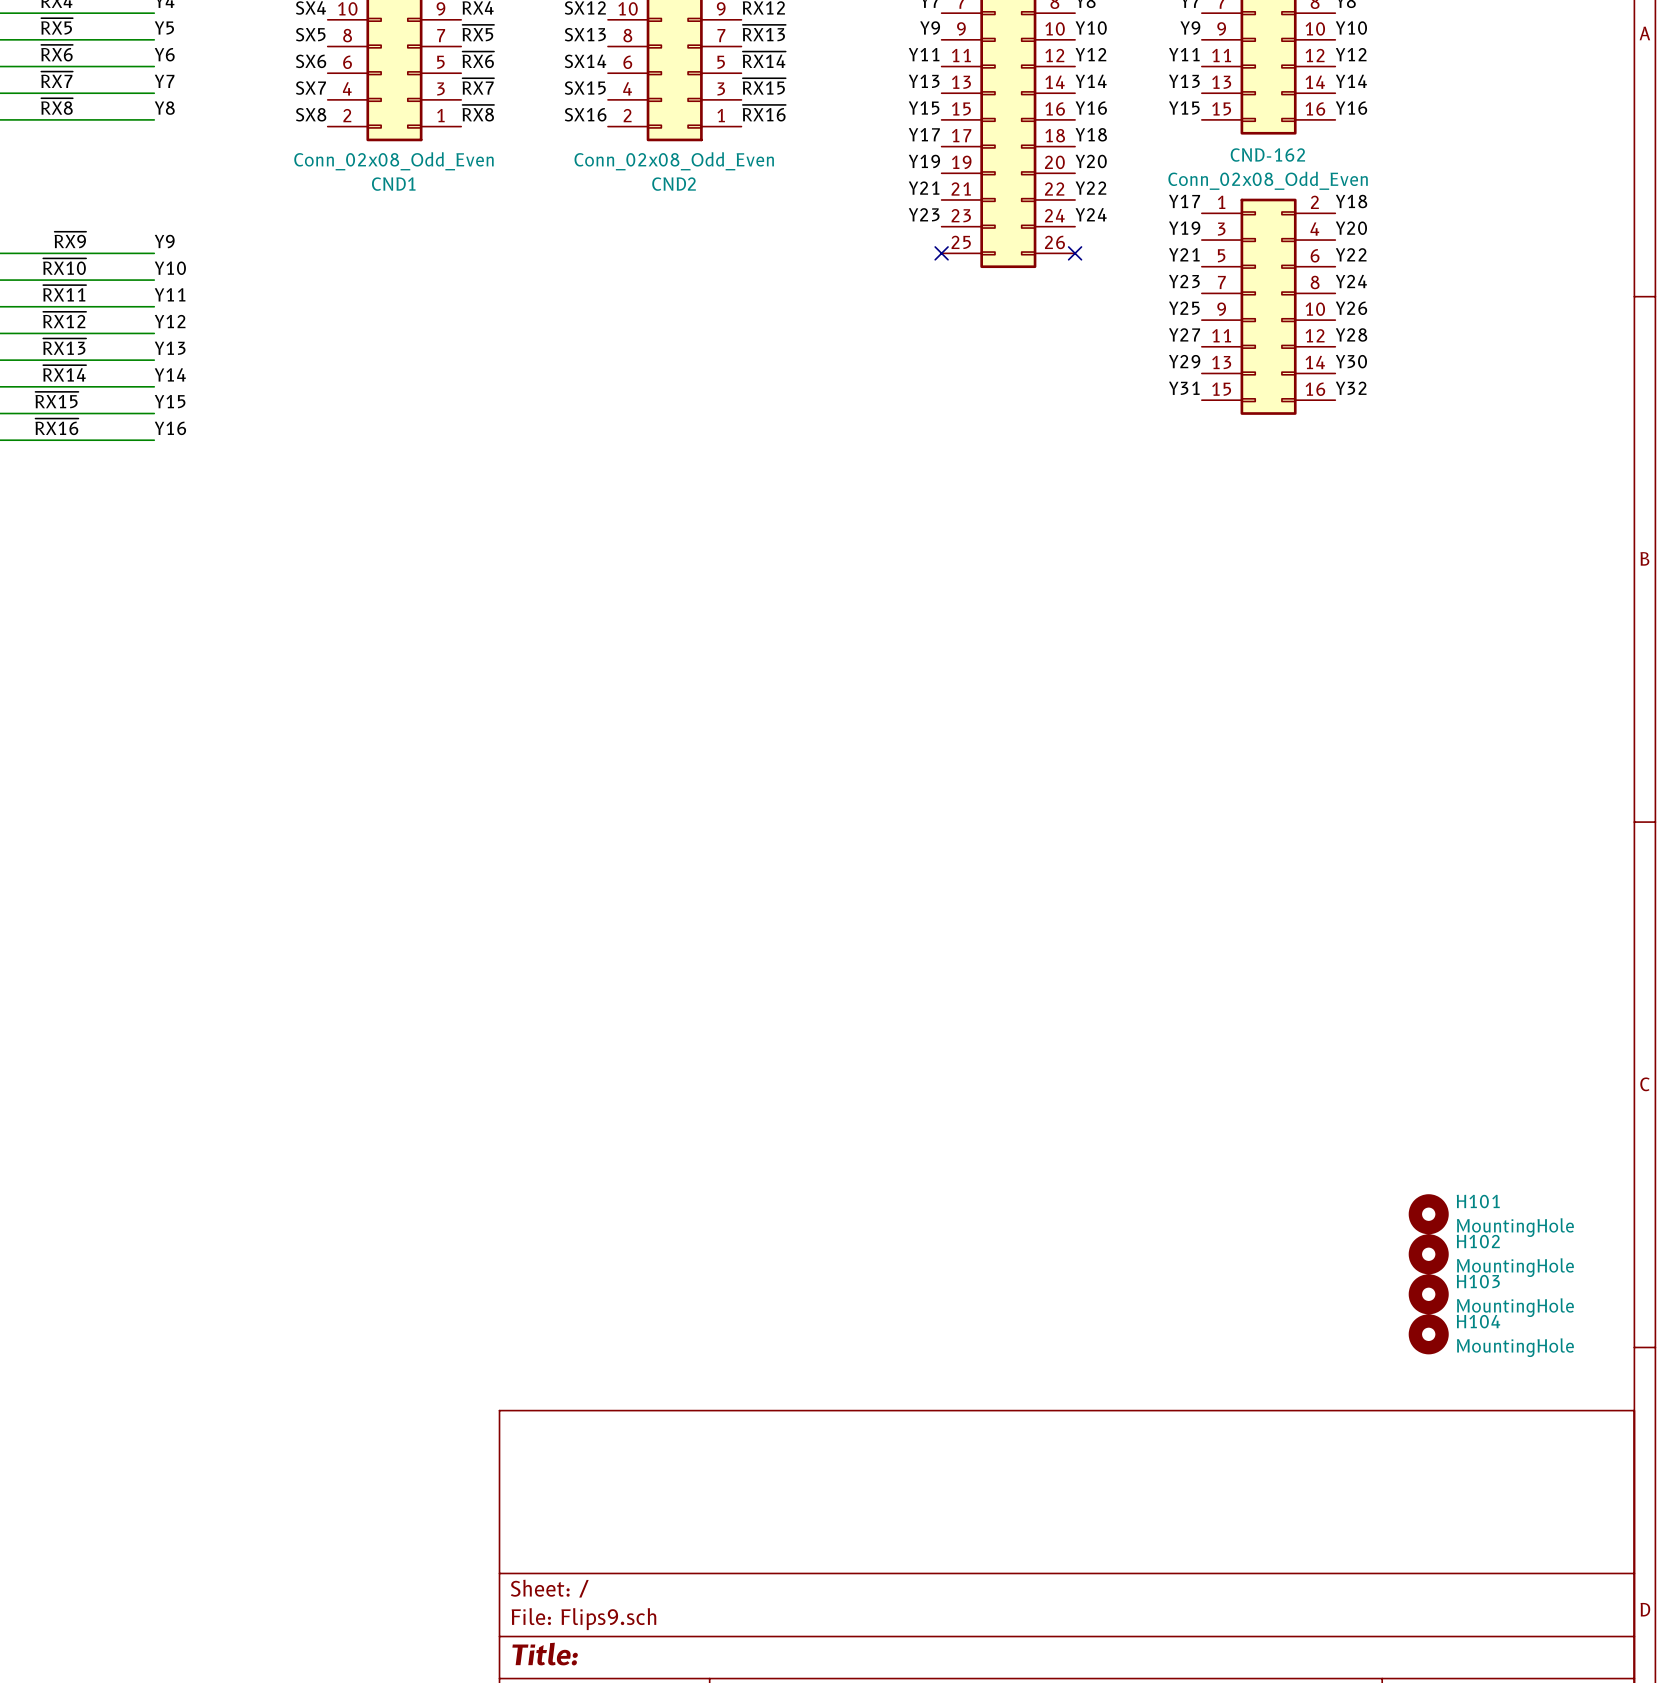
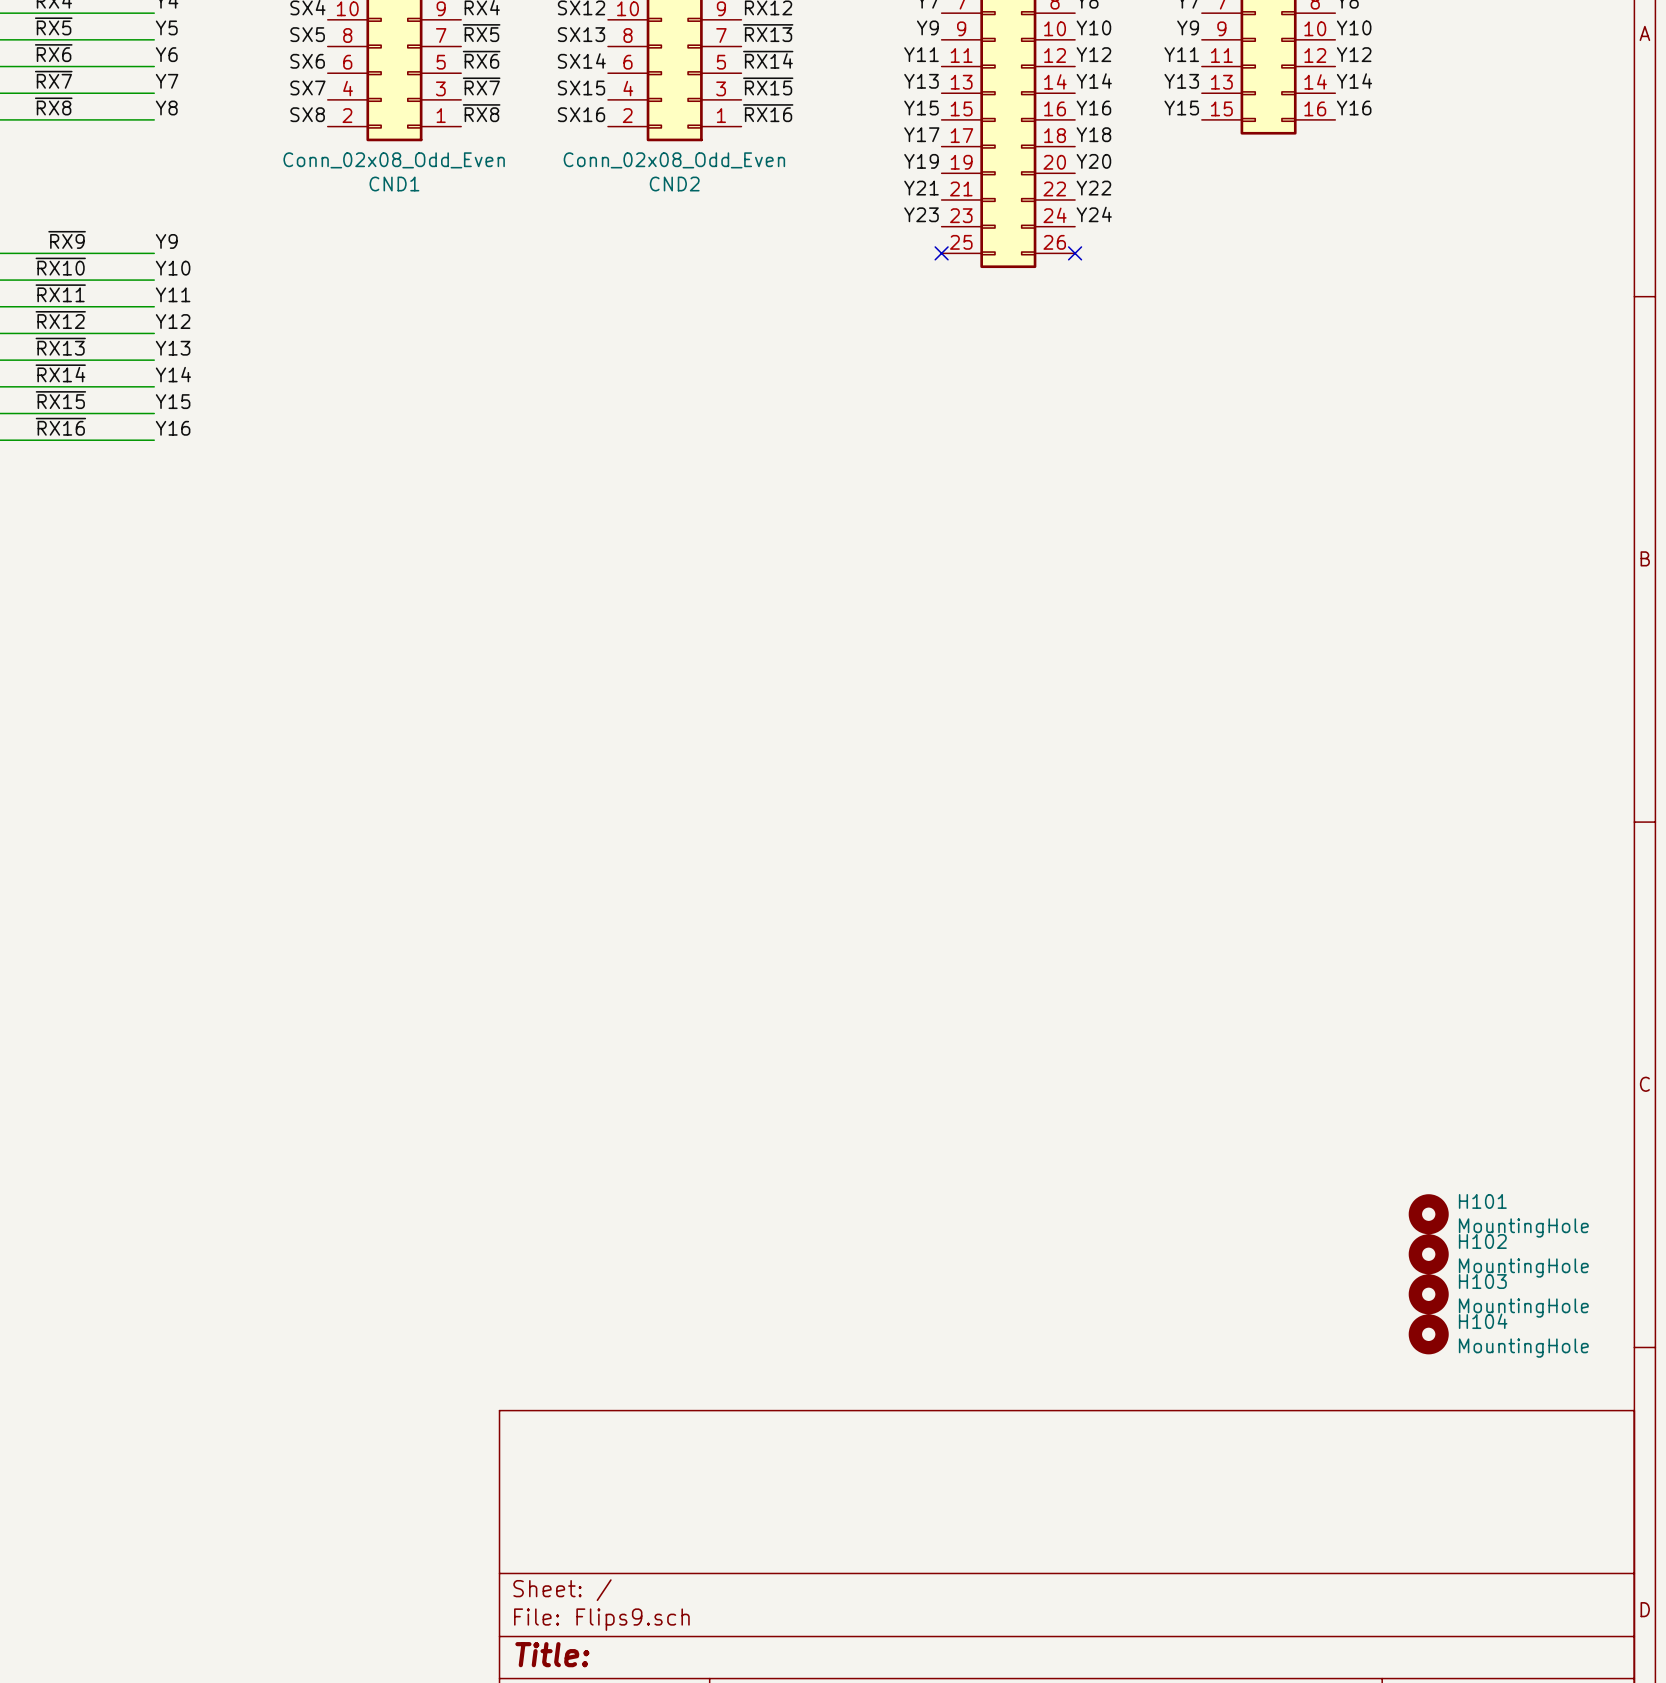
label: Y17 (1184, 201) -> none
label: Y18 (1351, 201) -> none
label: Y19 (1184, 228) -> none
label: Y20 (1351, 228) -> none
label: Y21 (1184, 254) -> none
label: Y22 (1351, 254) -> none
label: Y23 (1184, 281) -> none
label: Y24 (1351, 281) -> none
CND-162: Conn_02x08_Odd_Even (1268, 306) -> none
label: Y25 (1184, 308) -> none
label: Y26 (1351, 308) -> none
label: Y27 (1184, 334) -> none
label: Y28 (1351, 334) -> none
label: Y29 (1184, 361) -> none
label: Y30 (1351, 361) -> none
label: Y31 (1184, 388) -> none
label: Y32 (1351, 388) -> none

